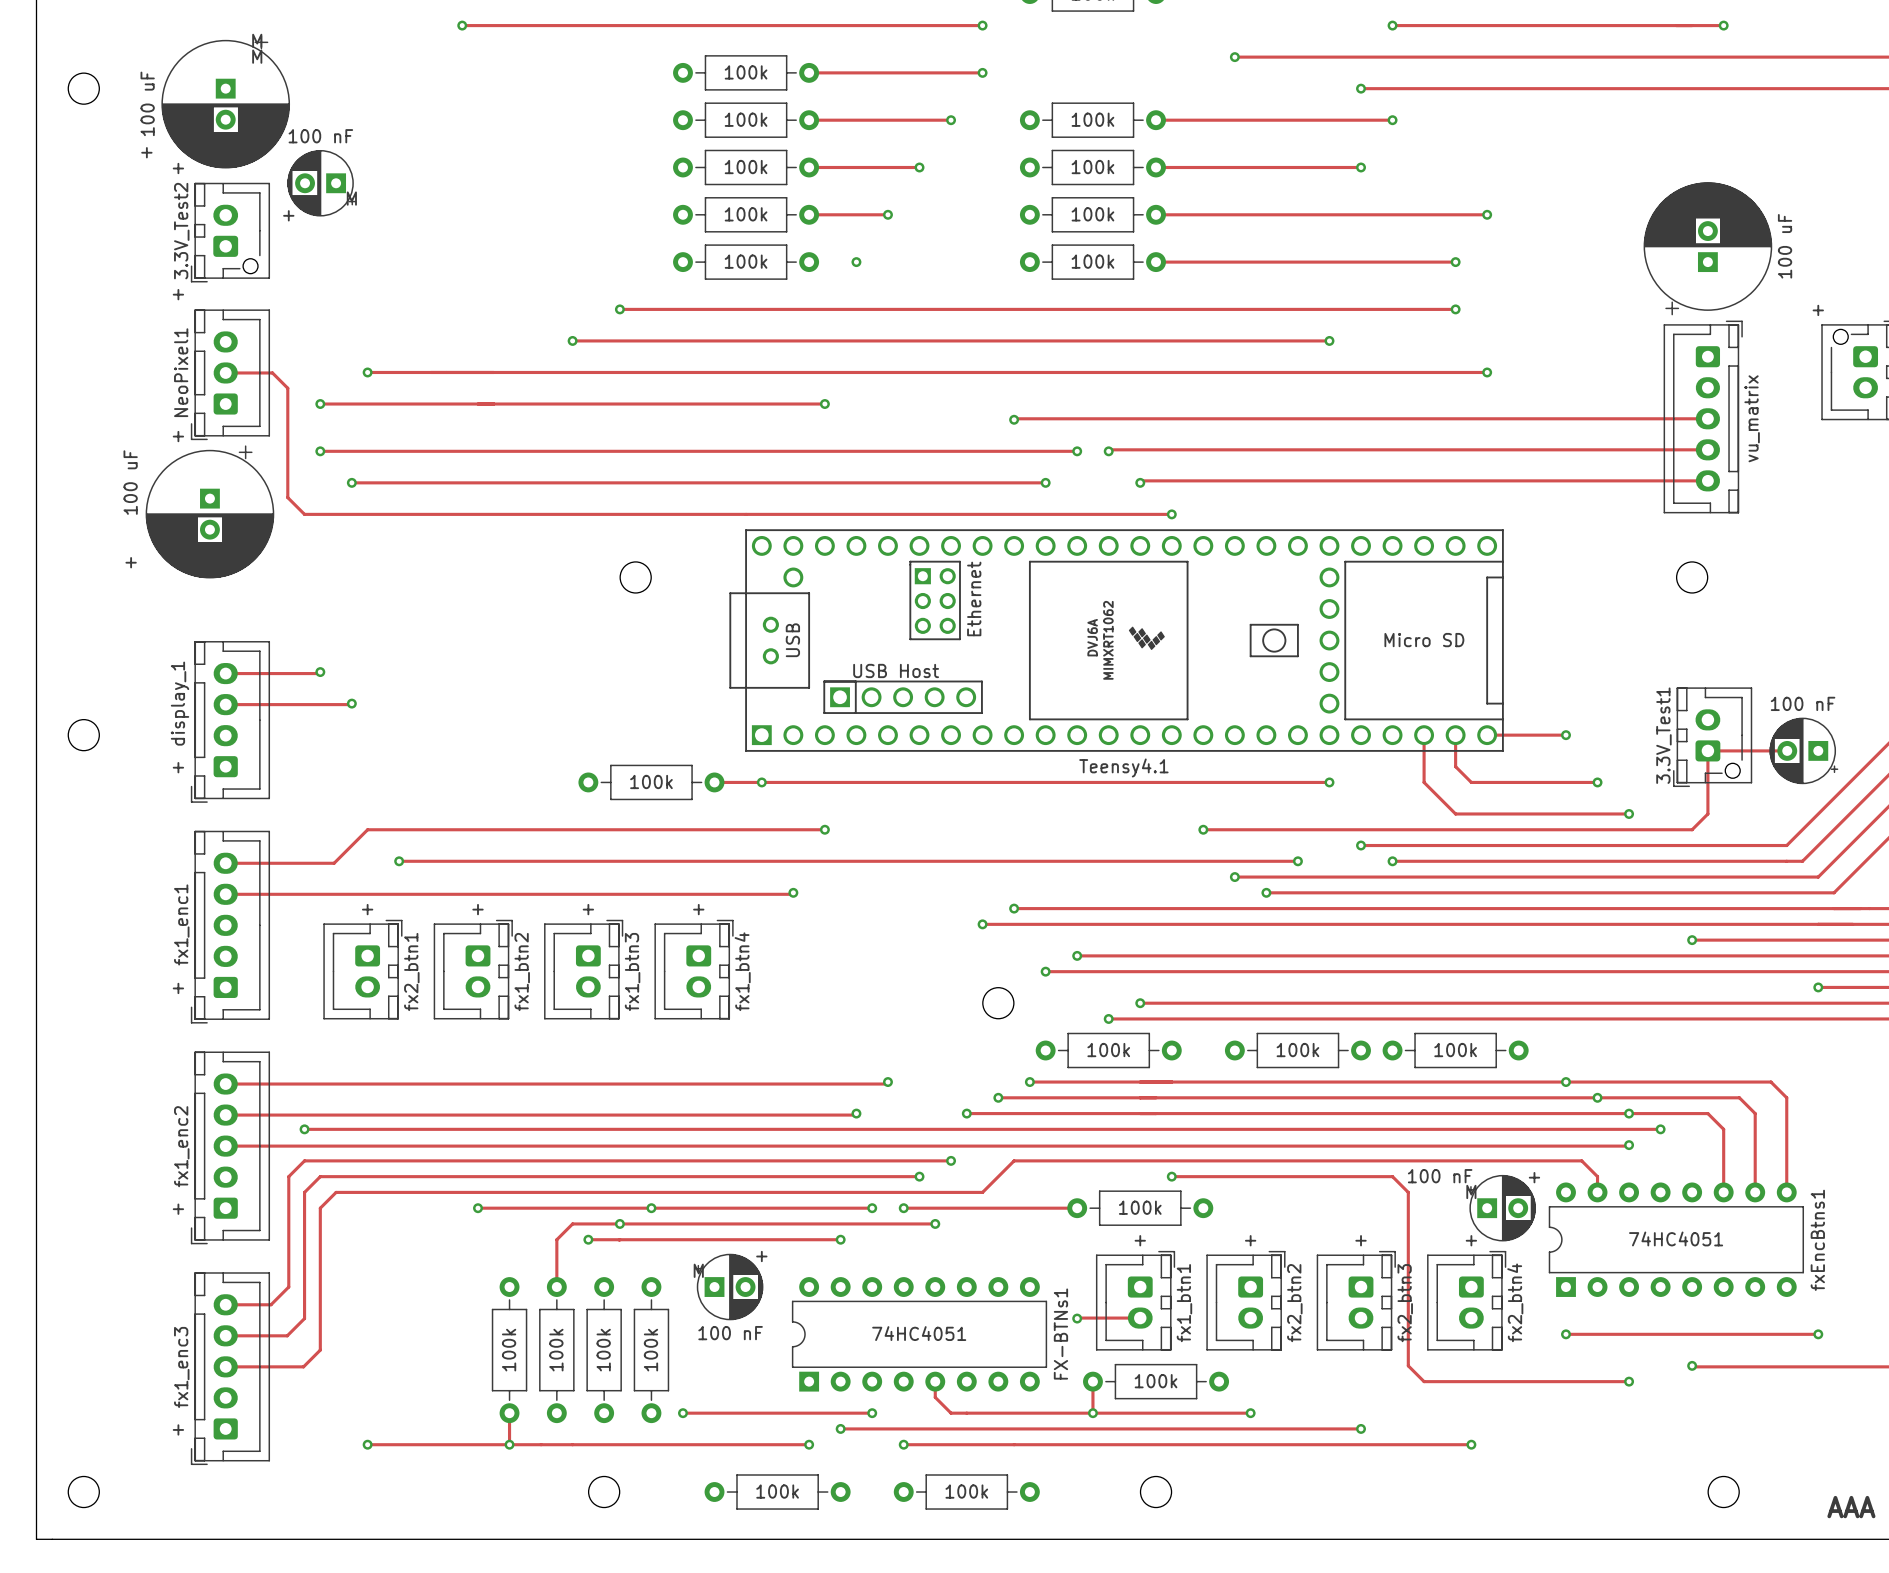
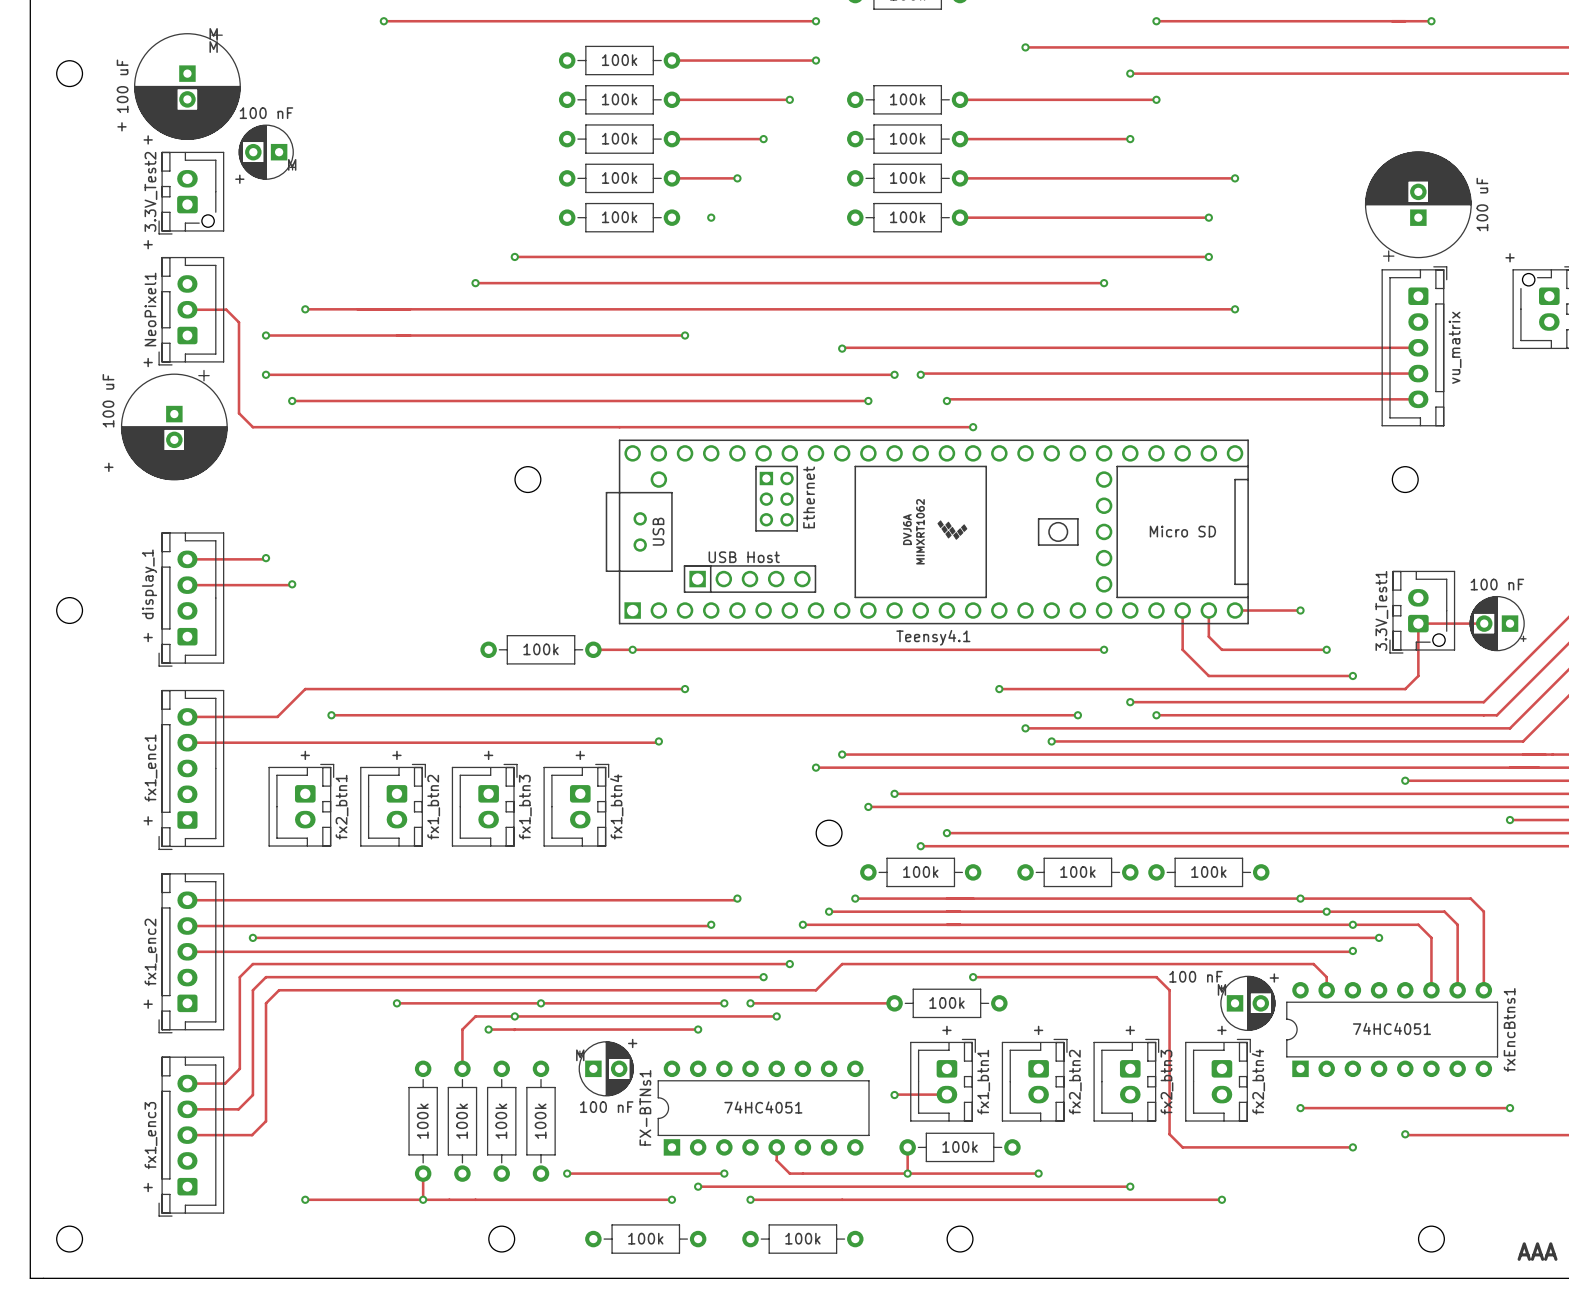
FX-BTNs1 name position: FX-BTNs1 (1060, 1334) -> FX-BTNs1 (645, 1107)

